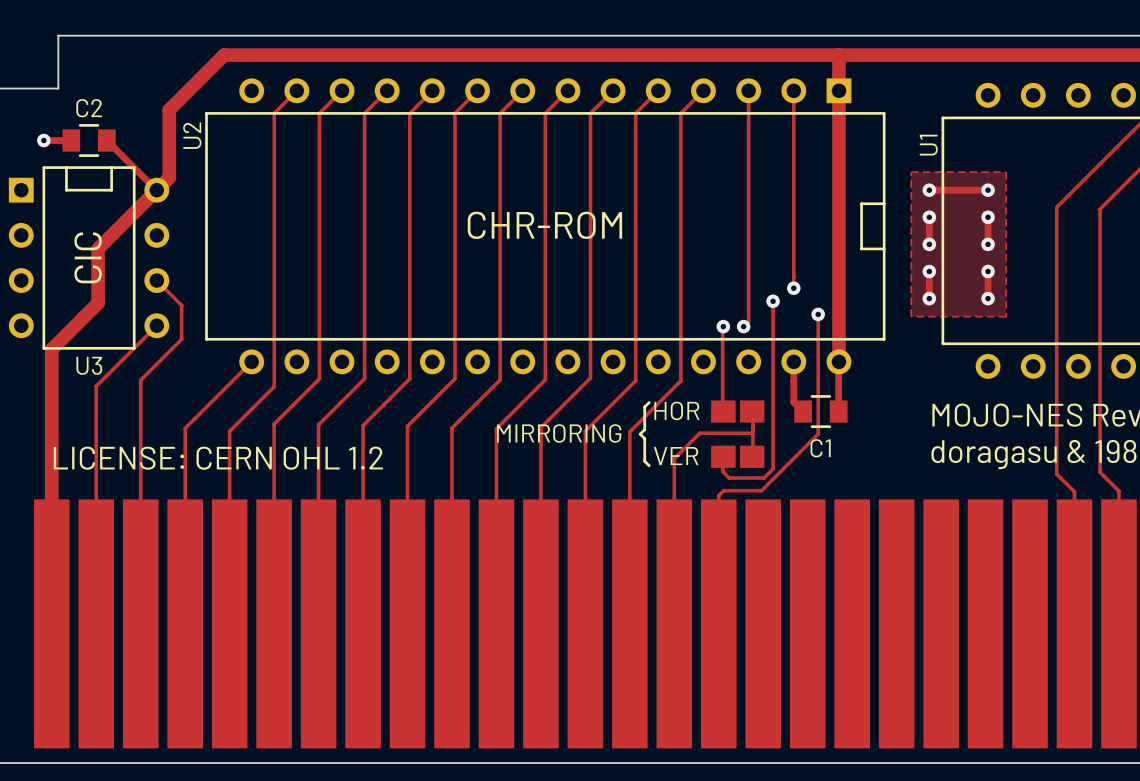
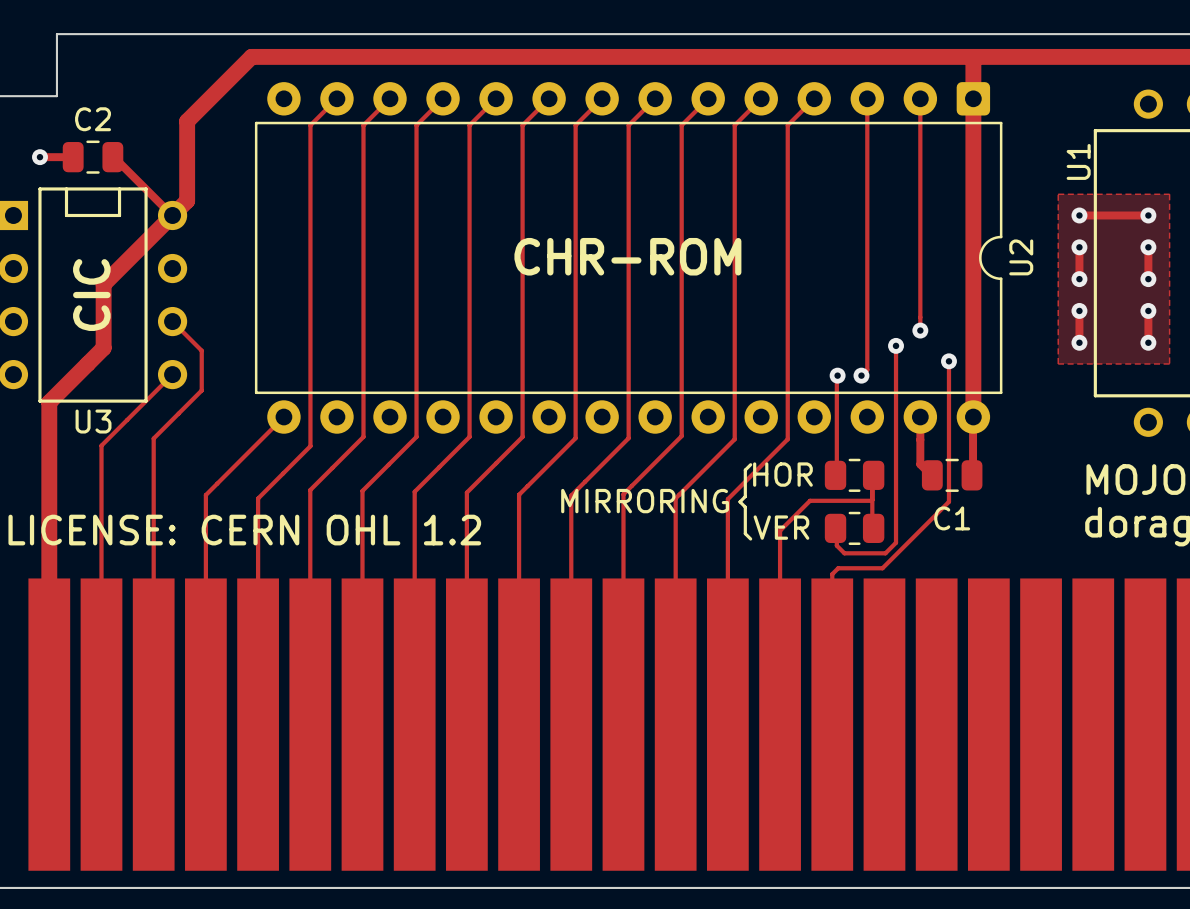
U2 footprint: [205, 78, 886, 375] -> [254, 82, 1003, 434]
C2 footprint: [62, 124, 116, 157] -> [62, 140, 124, 174]
U2 name position: U2 (192, 135) -> U2 (1021, 257)
C1 footprint: [794, 395, 848, 429] -> [921, 458, 983, 492]
part footprint: [711, 400, 765, 423] -> [824, 458, 885, 492]
part footprint: [711, 445, 765, 468] -> [824, 511, 885, 545]

